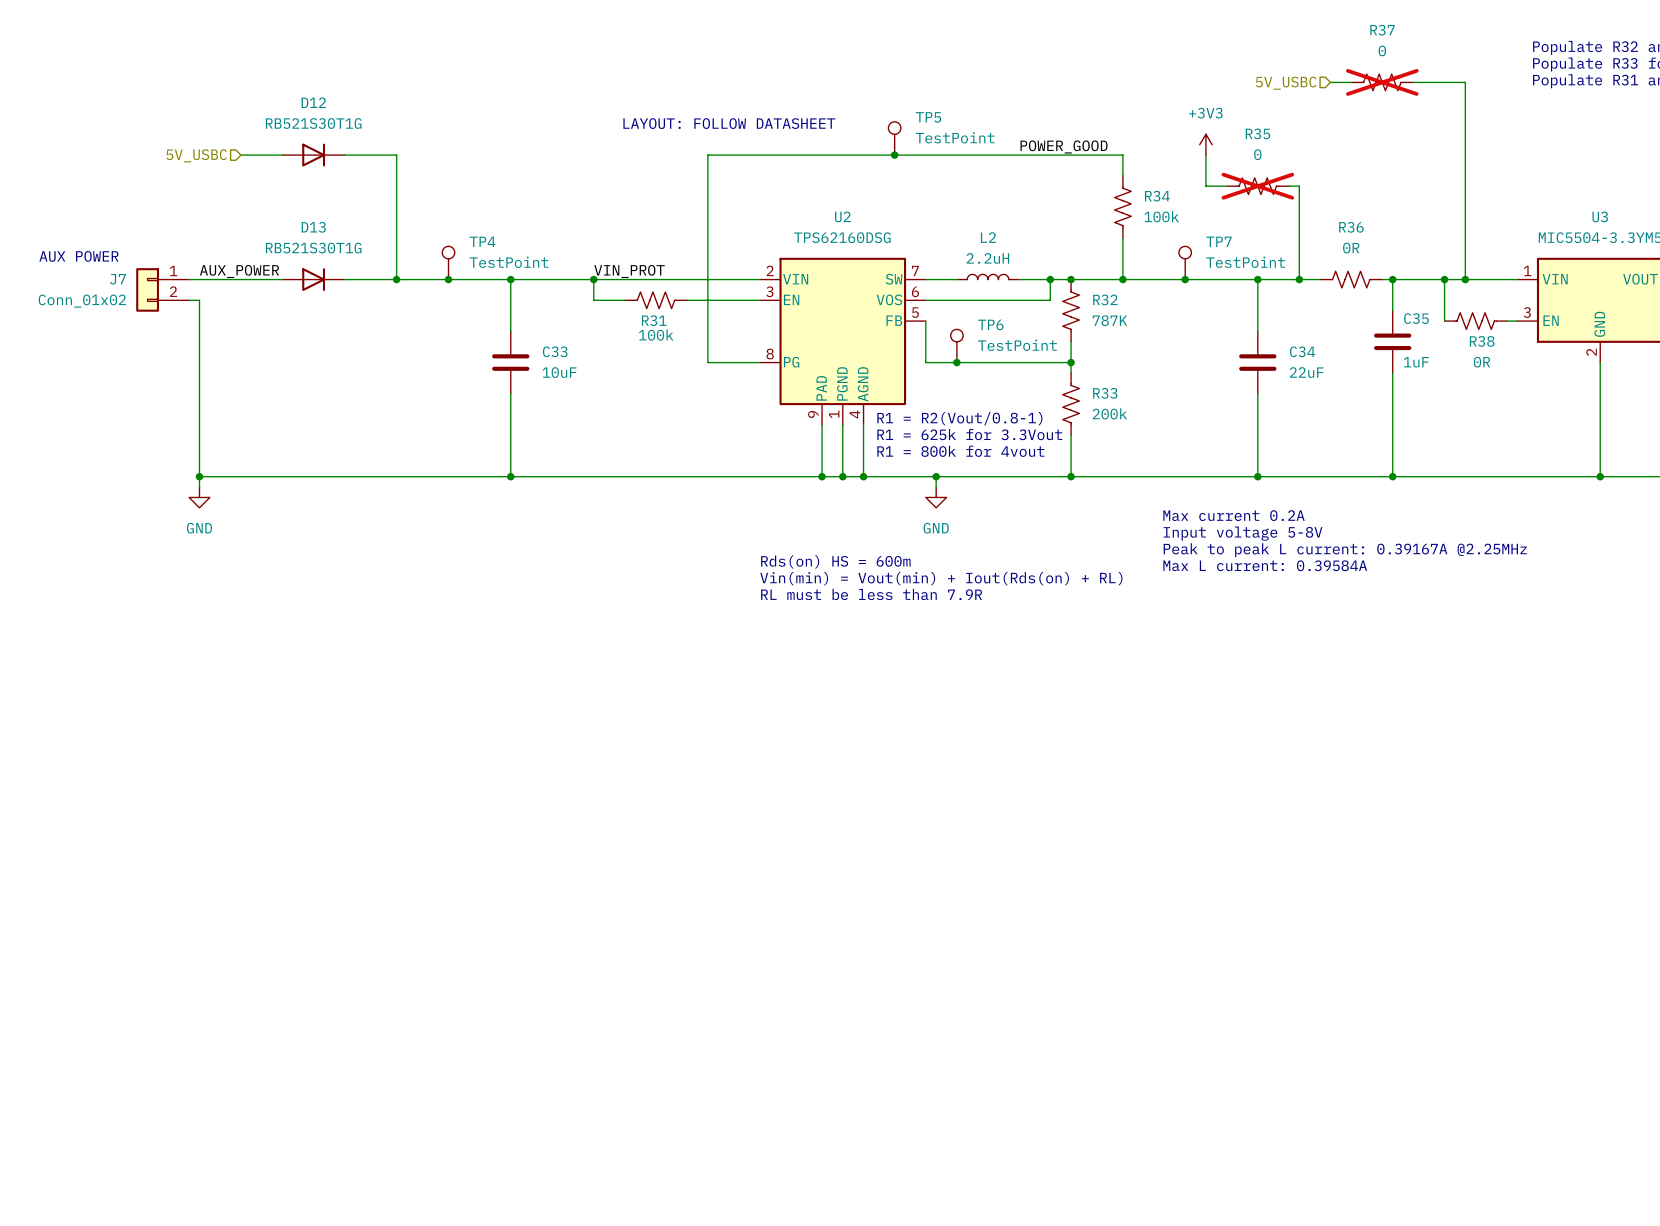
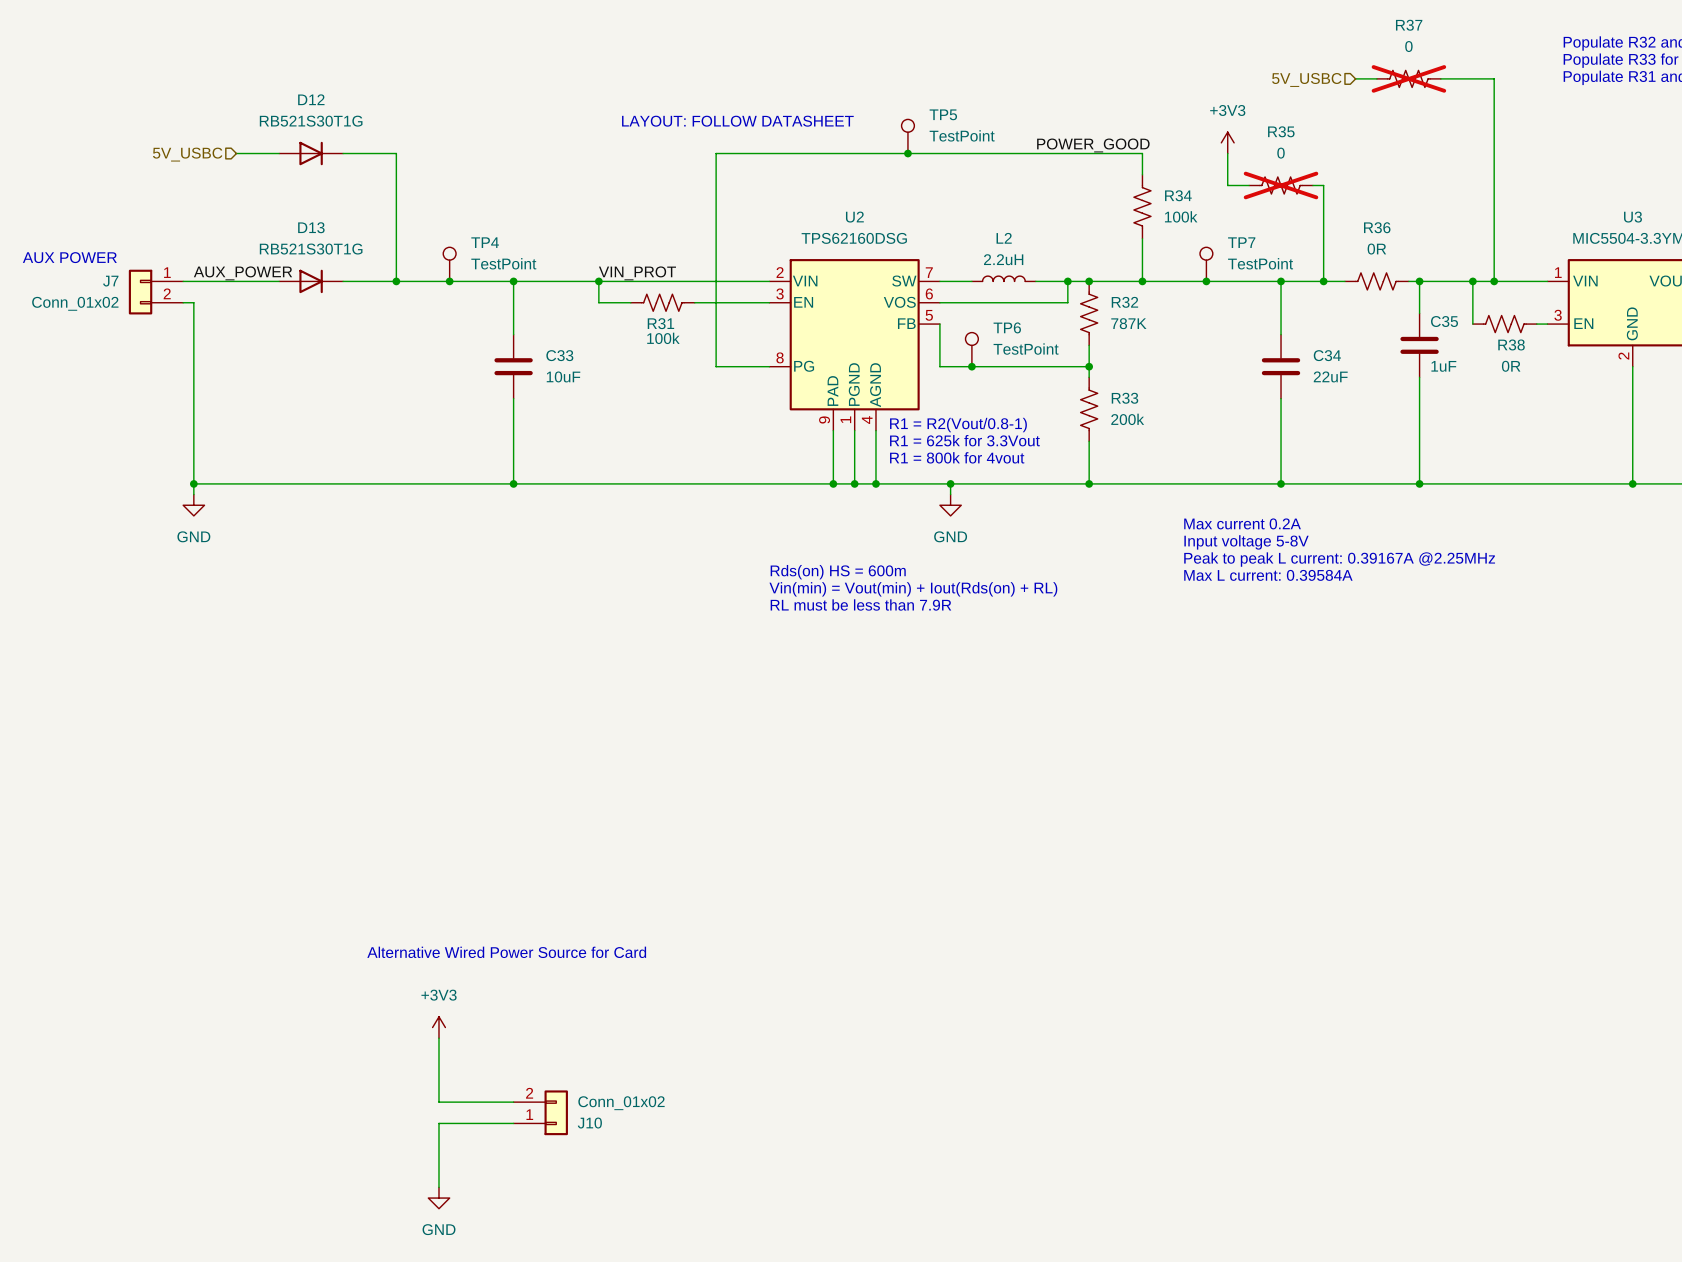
text: none -> Alternative Wired Power Source for Card (506, 952)
power symbol: none -> +3V3 (438, 1027)
wire: none -> (438, 1038) (438, 1102) (513, 1102)
J10: none -> Conn_01x02 (540, 1112)
wire: none -> (513, 1123) (438, 1123) (438, 1187)
power symbol: none -> GND (438, 1198)

